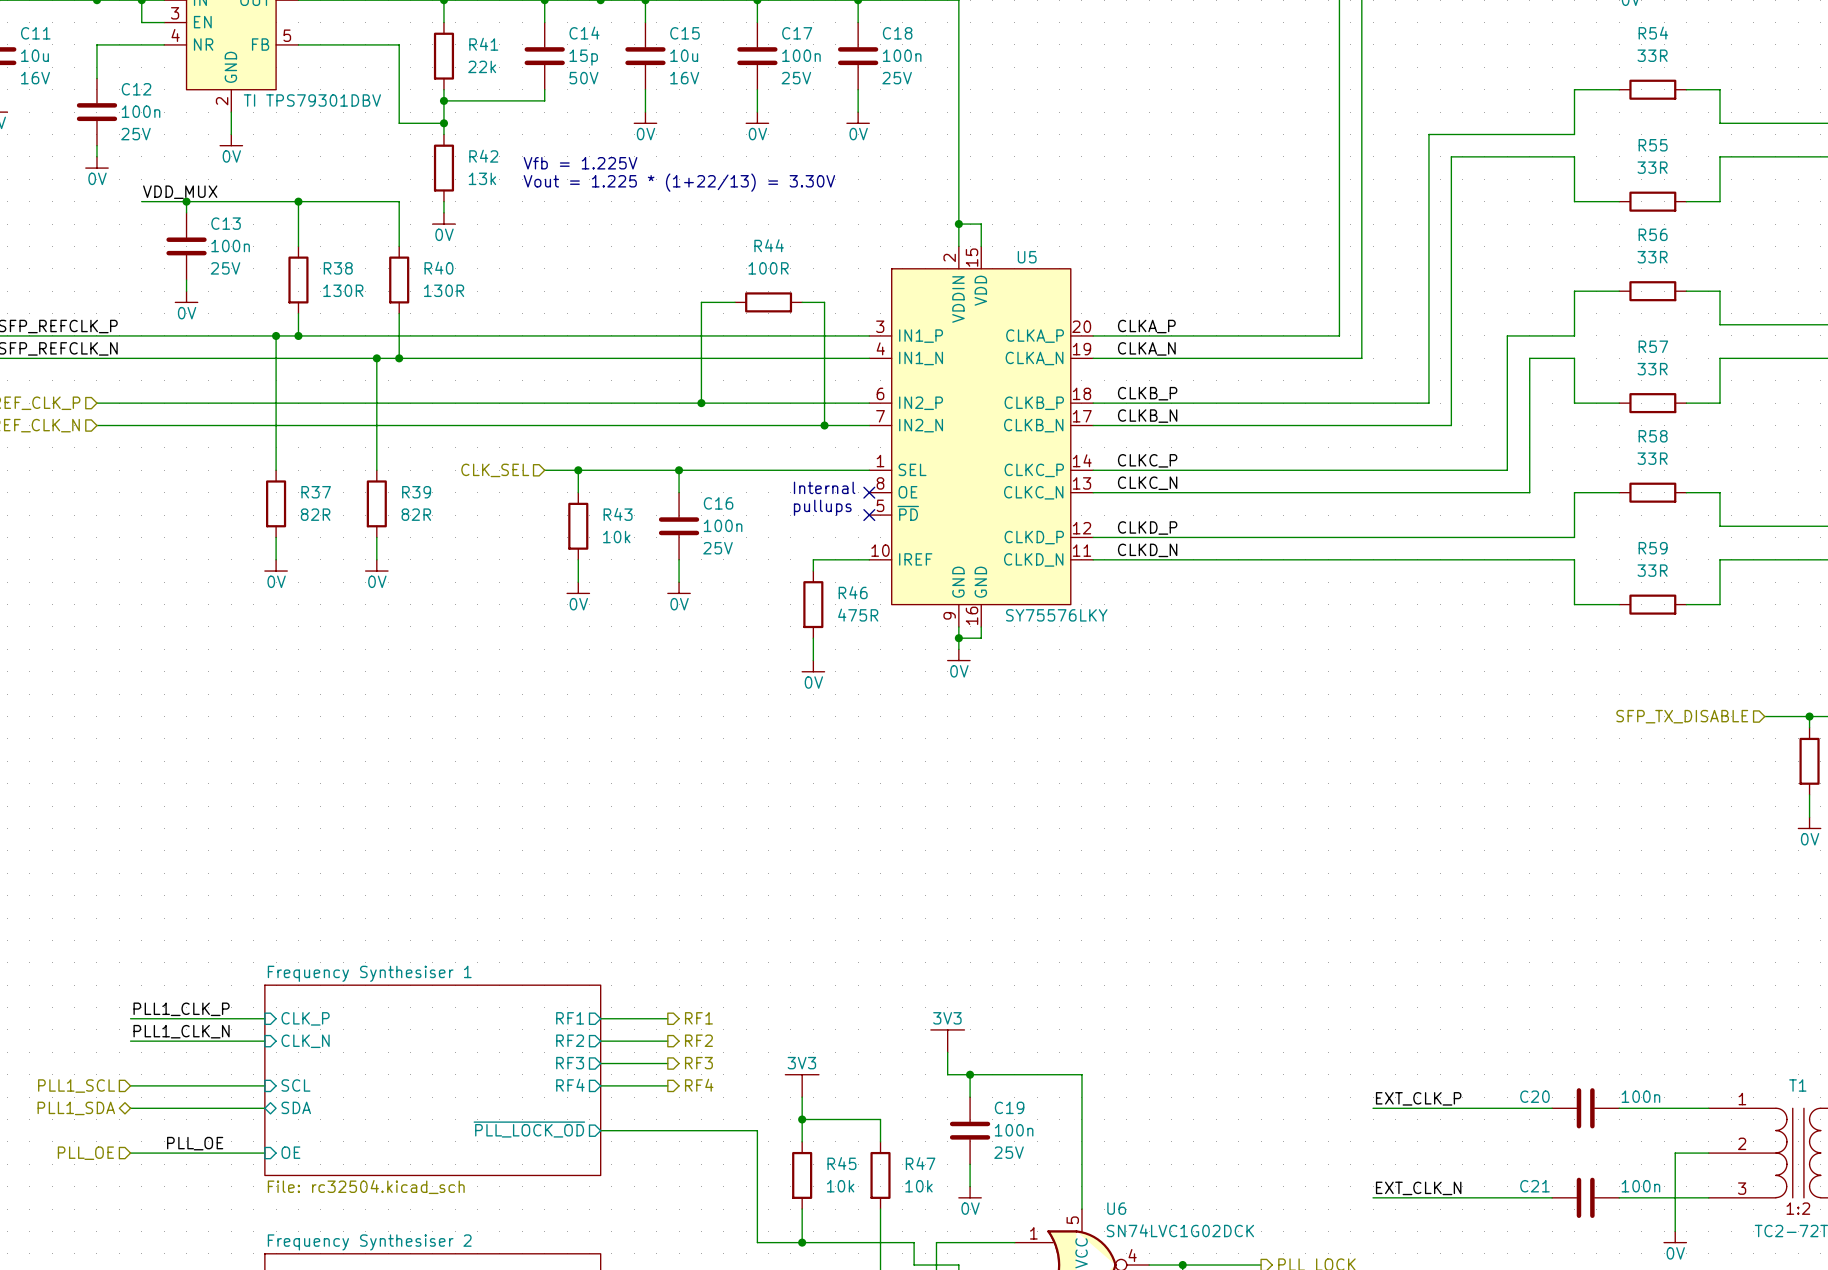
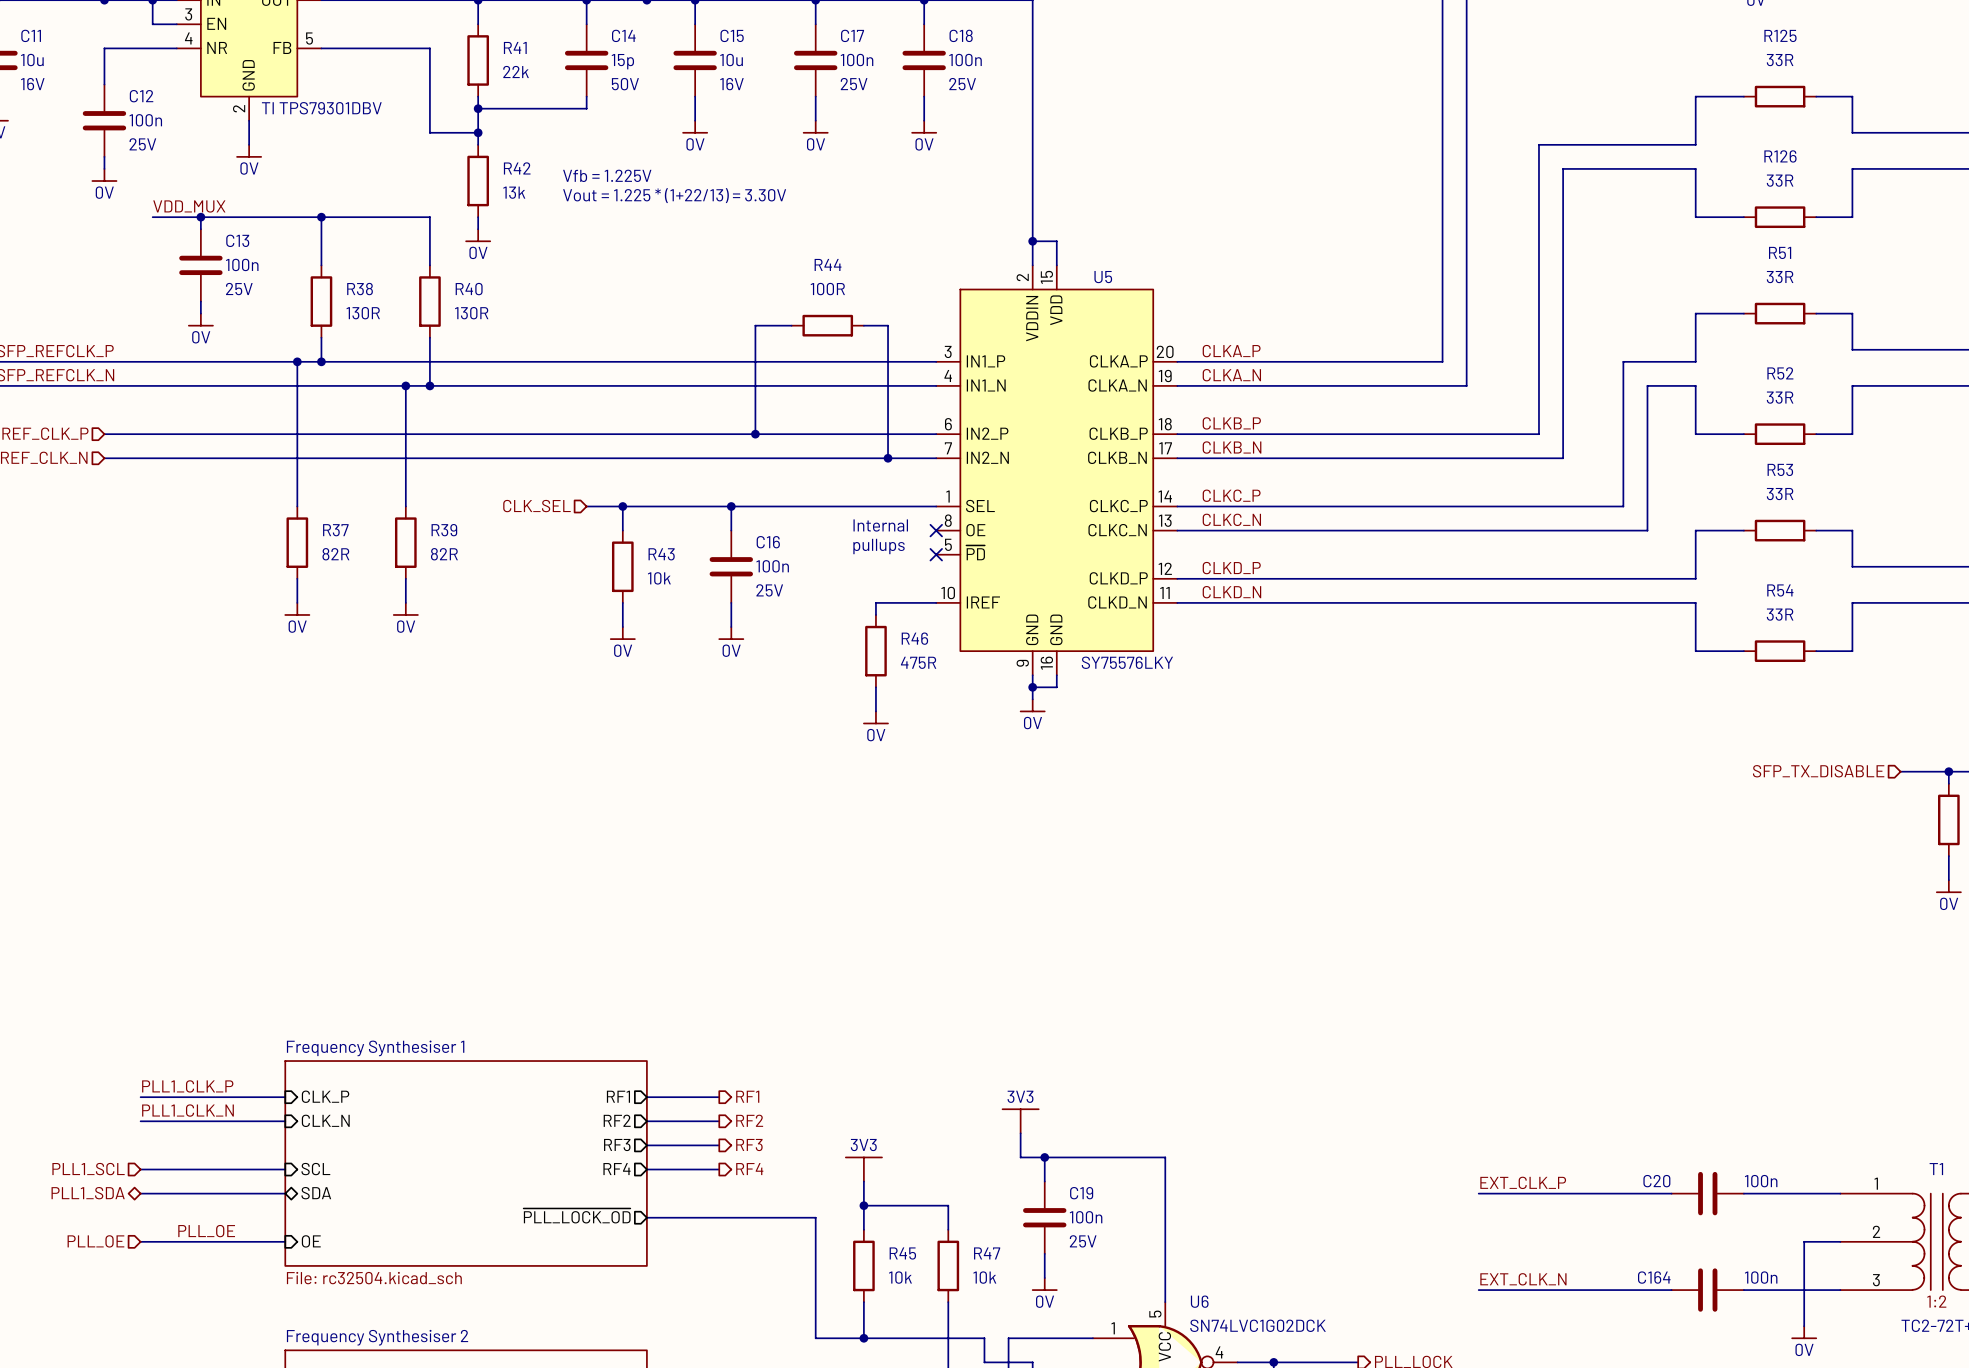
R54 name: R54 (1653, 33) -> R125 (1780, 35)
R55 name: R55 (1653, 145) -> R126 (1780, 156)
R56 name: R56 (1653, 234) -> R51 (1780, 252)
R57 name: R57 (1653, 346) -> R52 (1780, 373)
R58 name: R58 (1653, 436) -> R53 (1780, 469)
R59 name: R59 (1653, 548) -> R54 (1780, 590)
C21 name: C21 (1534, 1186) -> C164 (1654, 1277)

